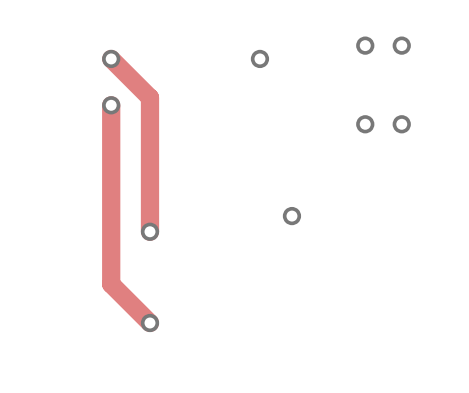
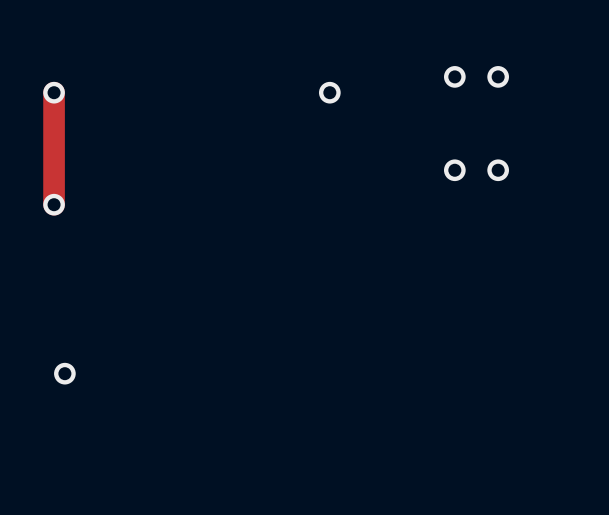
track: none -> (54, 92) (54, 204)
via: none -> (54, 92)
track: (111, 58) (149, 97) (149, 231) -> none
via: (111, 58) -> none
track: (111, 105) (111, 284) (149, 323) -> none
via: (111, 105) -> none
via: none -> (54, 204)
via: (291, 216) -> none
via: (149, 231) -> none
via: none -> (64, 373)
via: (149, 323) -> none

